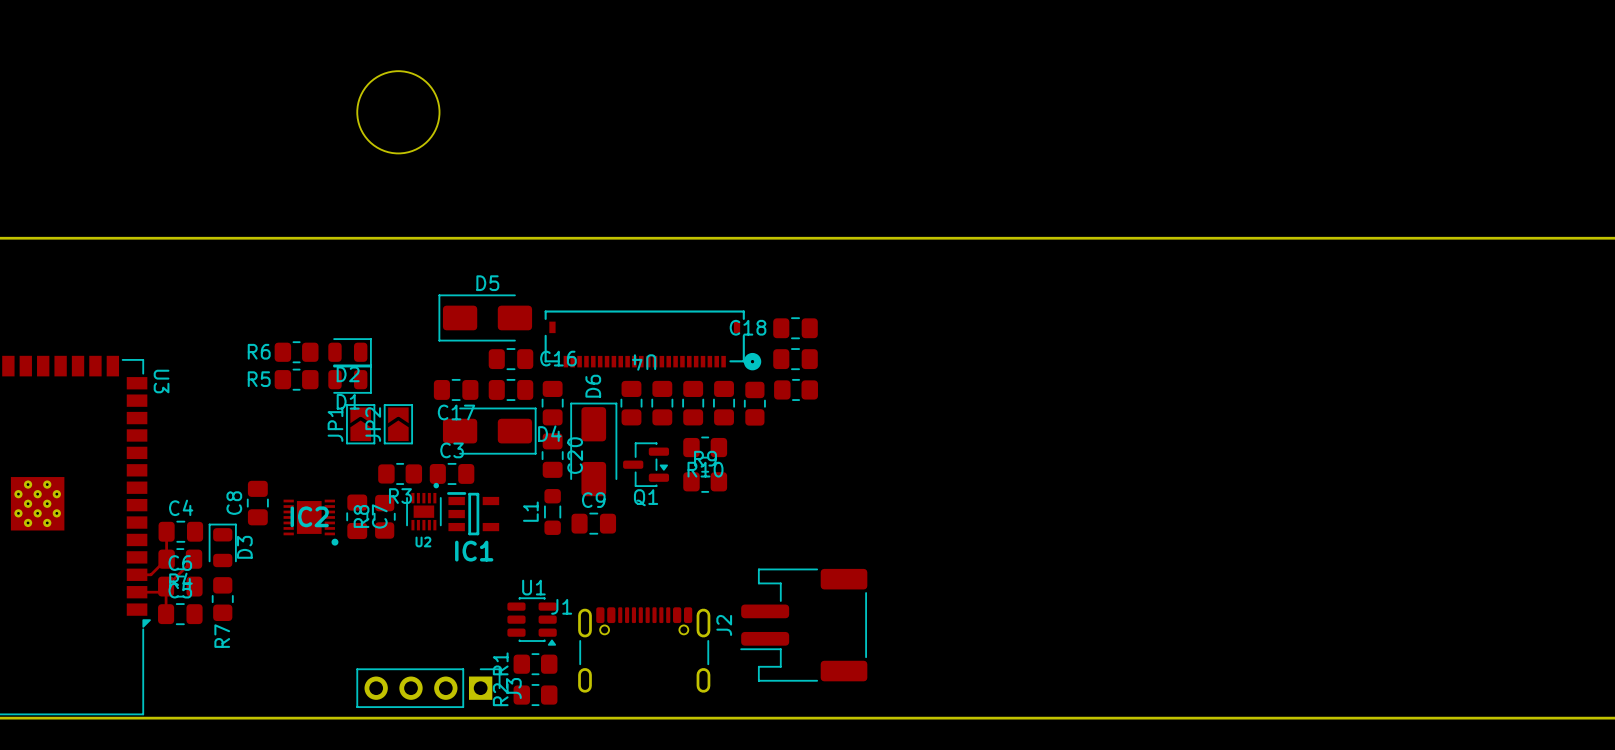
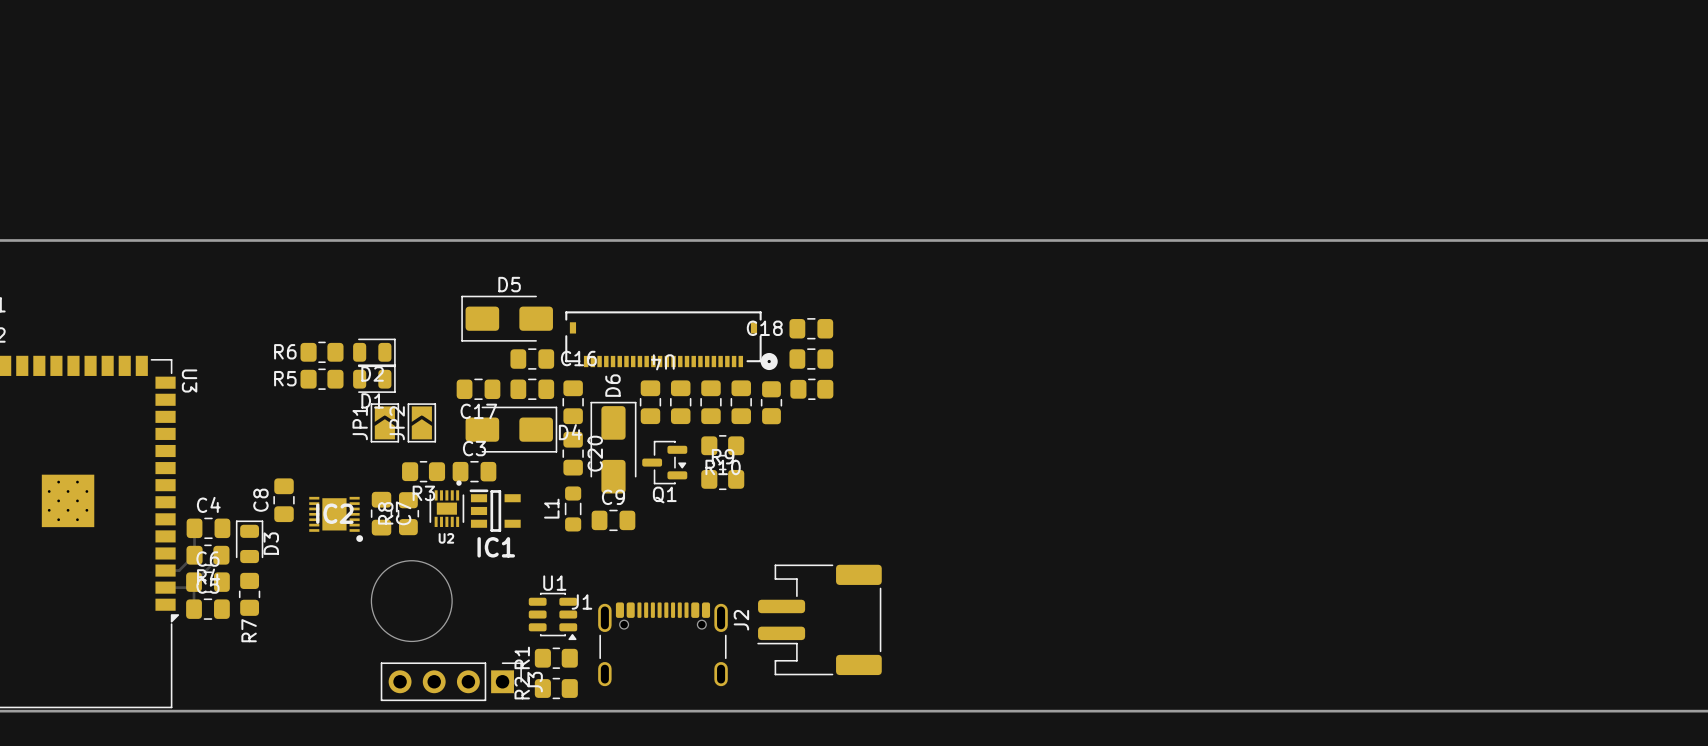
round board edge: [356, 70, 440, 154] -> none
round board edge: none -> [371, 560, 453, 642]

